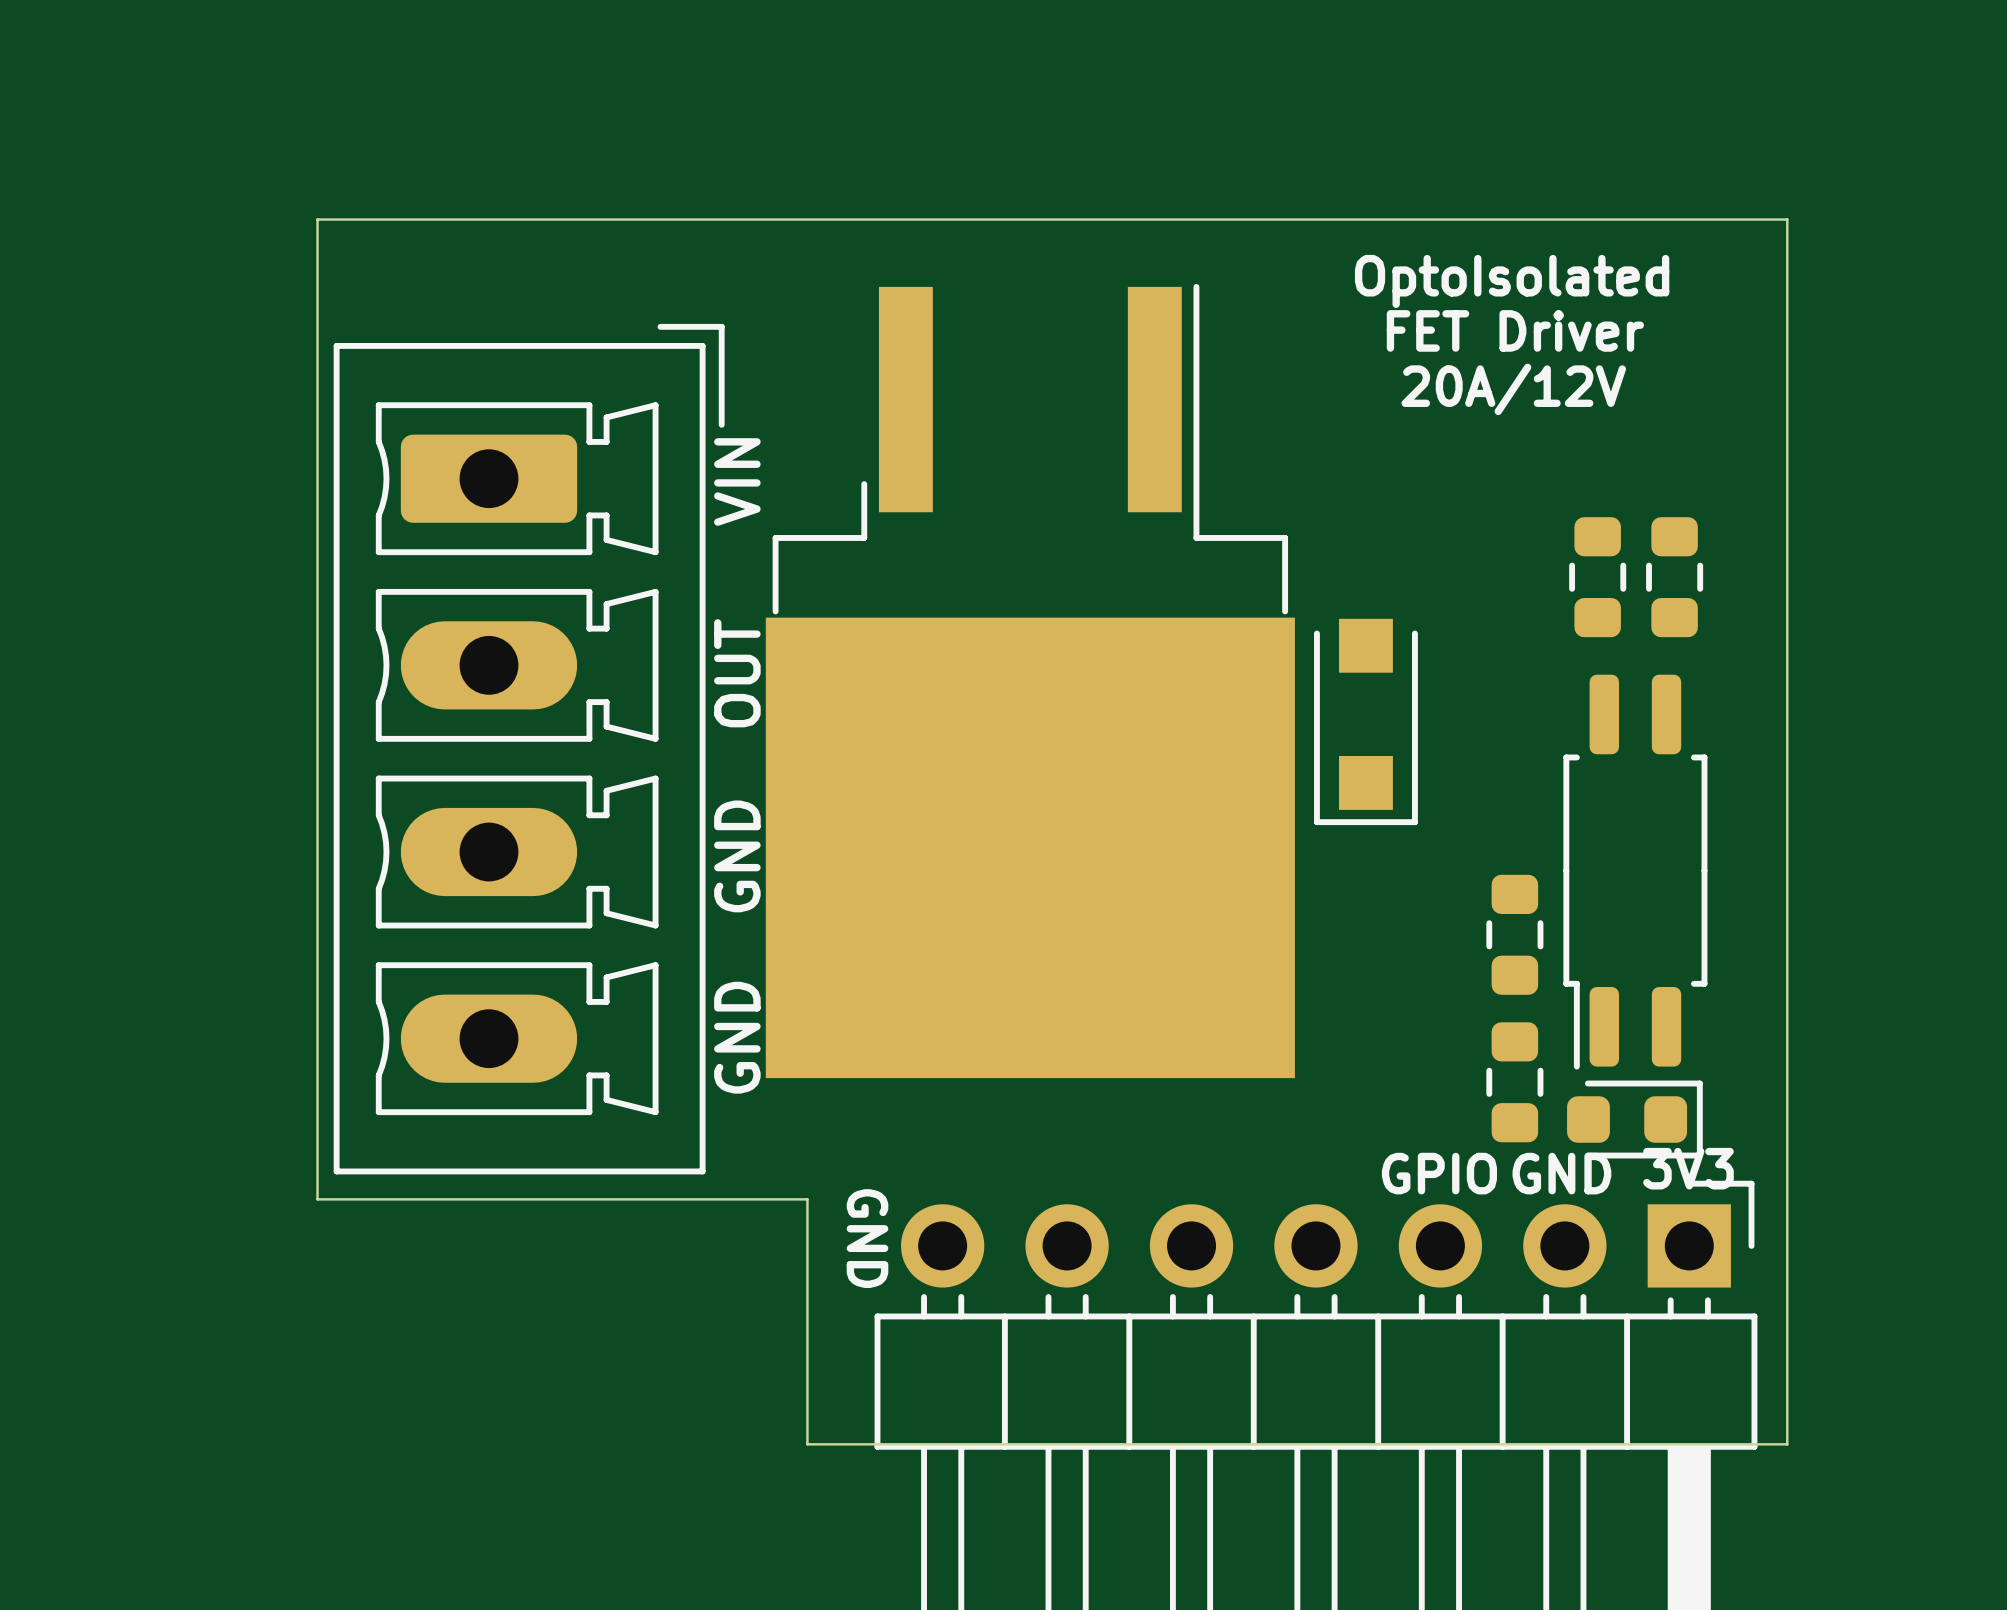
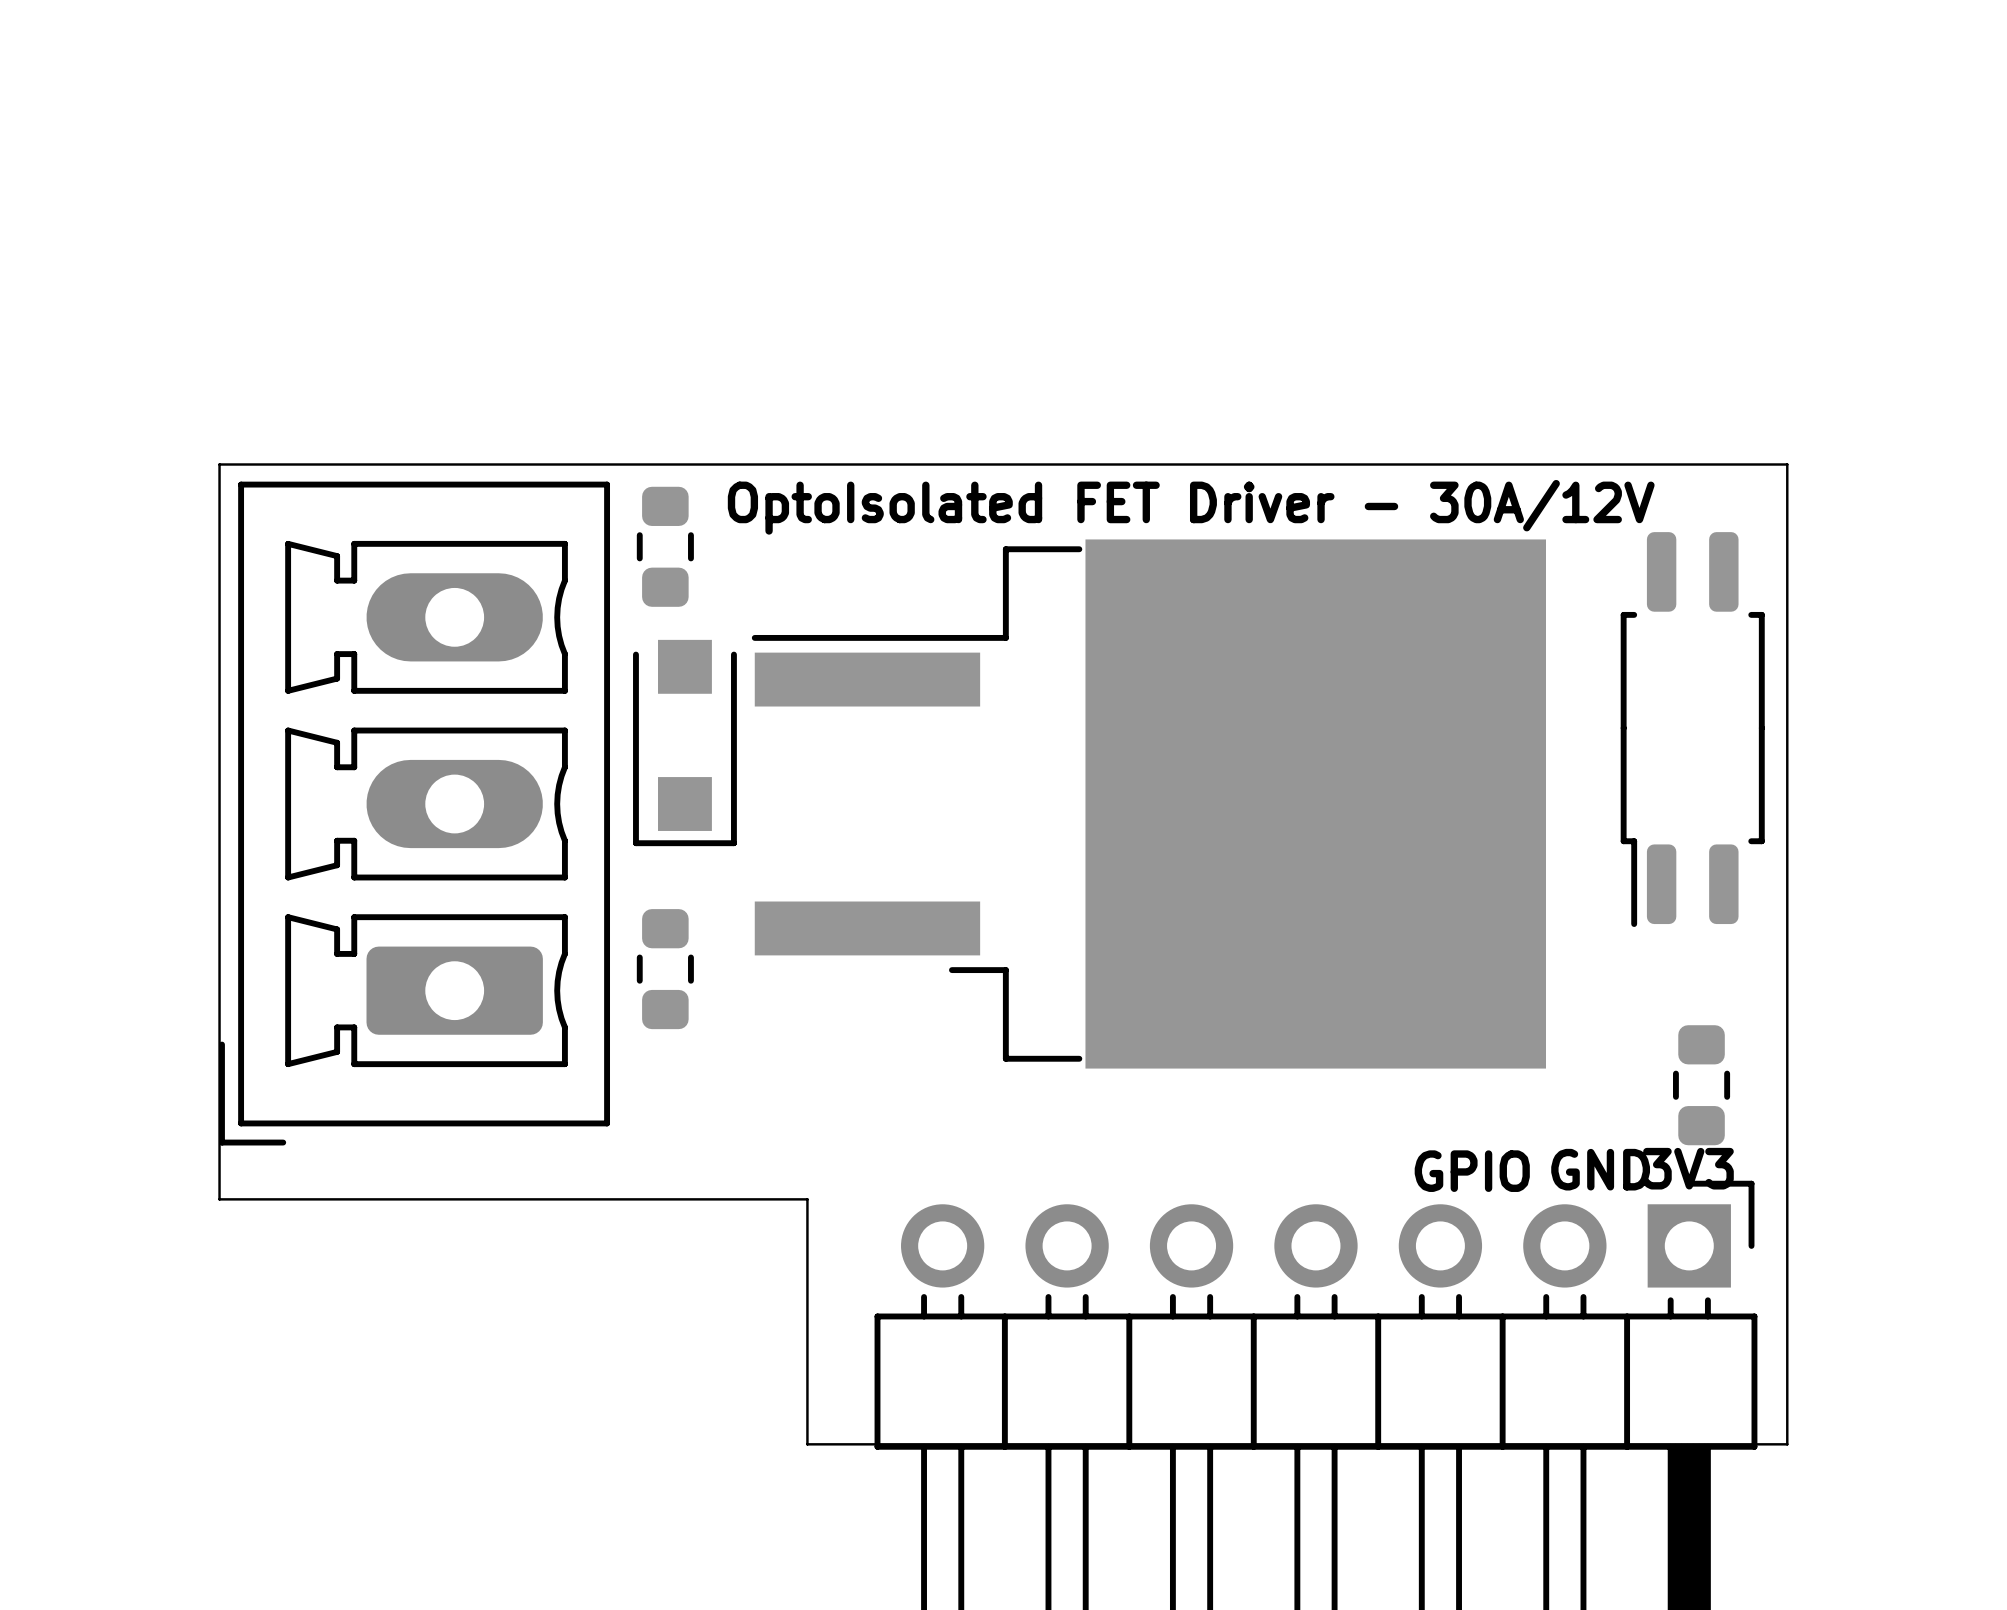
text: OptoIsolated (1512, 281) -> none
text: FET Driver (1515, 330) -> none
text: 20A/12V (1513, 389) -> none
board edge: (1787, 464) (1787, 219) (317, 219) (317, 1199) -> (1787, 464) (219, 464) (219, 1199) (317, 1199)
text: VIN (737, 481) -> none
text: none -> OptoIsolated FET Driver - 30A/12V (1191, 507)
part: none -> (665, 546)
part: (1597, 577) -> none
part: (1674, 577) -> none
text: OUT (737, 673) -> none
part rotation: 0° (1030, 681) -> 90° counterclockwise (1148, 804)
part position: (1365, 721) -> (684, 743)
part: (529, 749) -> none
part: none -> (414, 813)
text: GND (737, 856) -> none
part position: (1635, 872) -> (1692, 729)
part: (1514, 934) -> none
part: none -> (665, 969)
text: GND (737, 1037) -> none
part: (1514, 1082) -> none
part: none -> (1701, 1085)
part: (1634, 1119) -> none
text position: GPIO (1439, 1173) -> GPIO (1472, 1171)
text position: GND (1561, 1173) -> GND (1600, 1169)
text: GND (867, 1238) -> none

